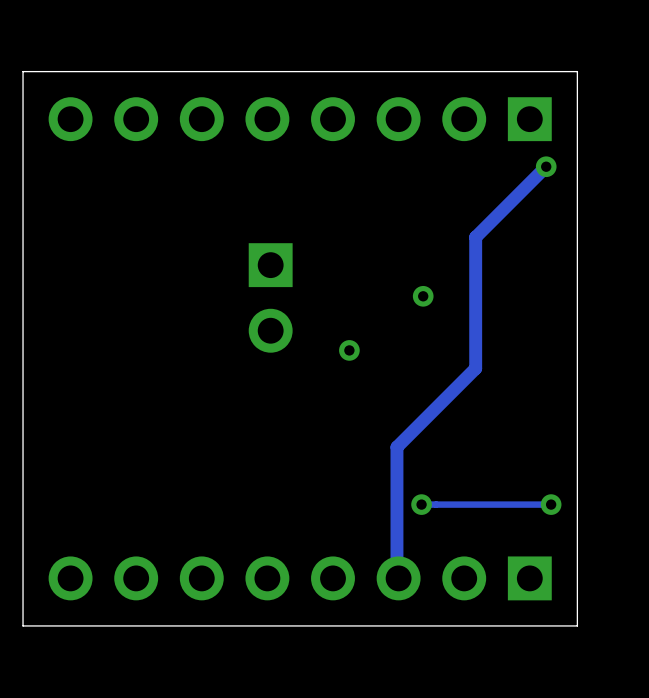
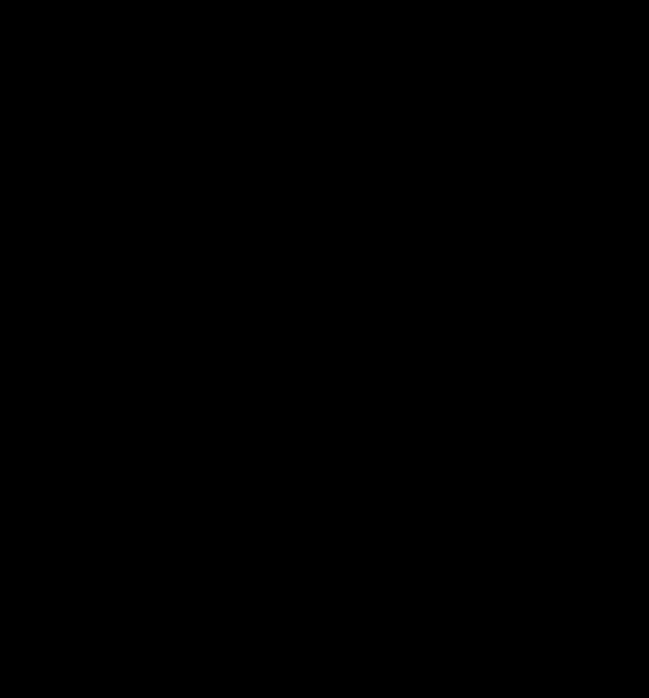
board edge: (577, 71) (23, 71) (23, 625) (577, 625) (577, 71) -> none
part: (300, 119) -> none
track: (546, 166) (475, 237) (475, 368) (396, 447) (396, 576) (398, 578) -> none
via: (546, 166) -> none
via: (423, 296) -> none
part: (270, 297) -> none
via: (349, 350) -> none
via: (421, 504) -> none
track: (551, 504) (421, 504) -> none
via: (551, 504) -> none
part: (300, 578) -> none

